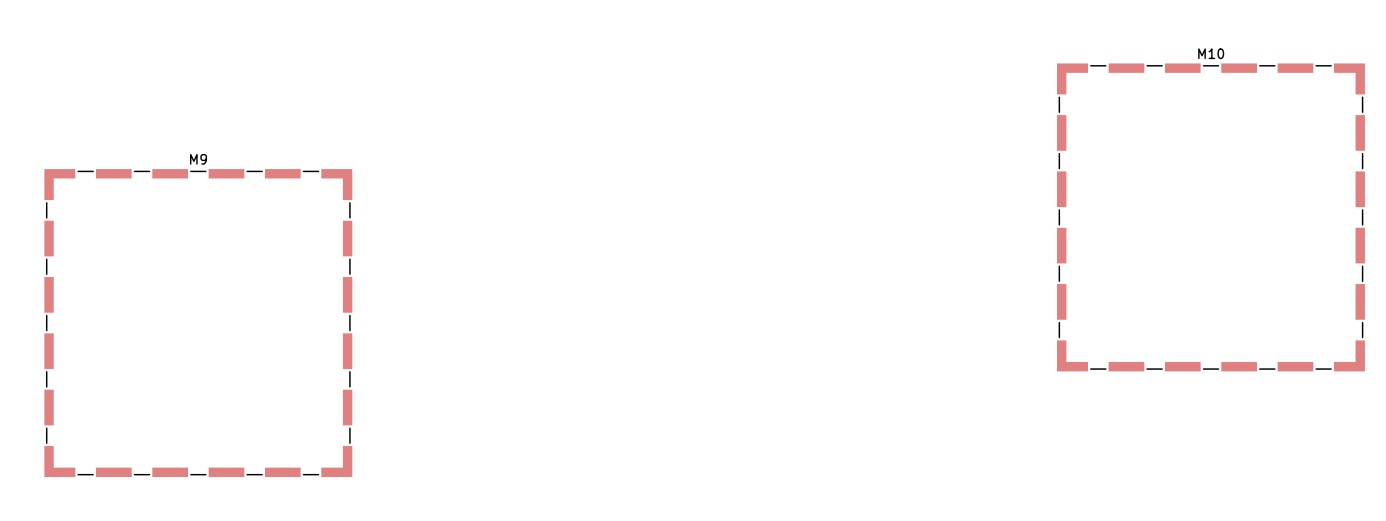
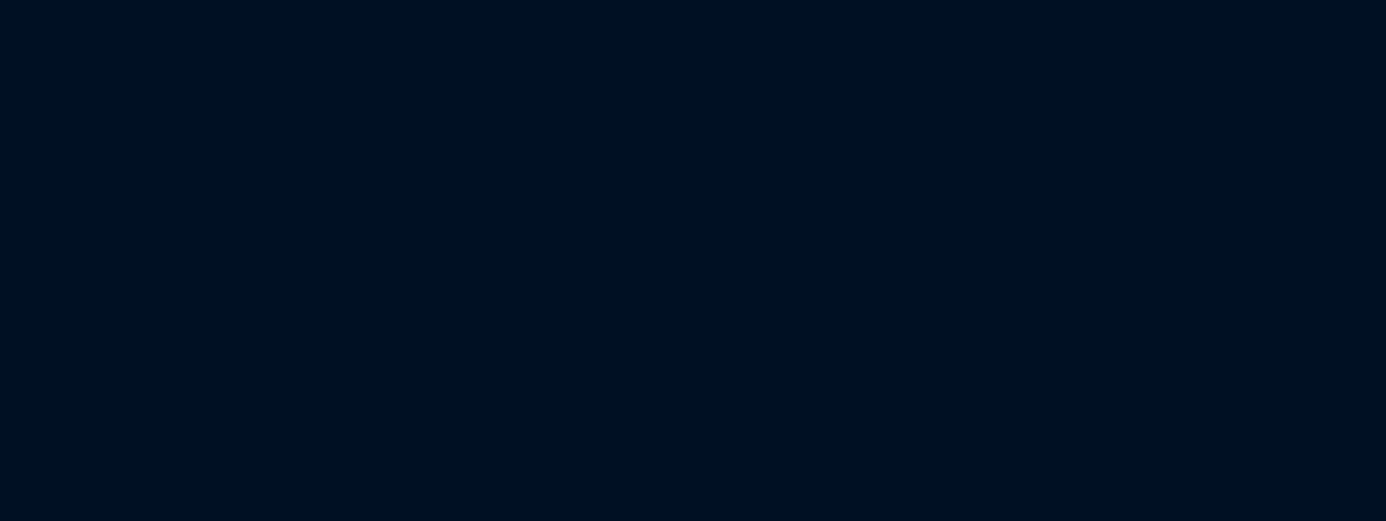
M10: (1210, 217) -> none
M9: (198, 323) -> none

